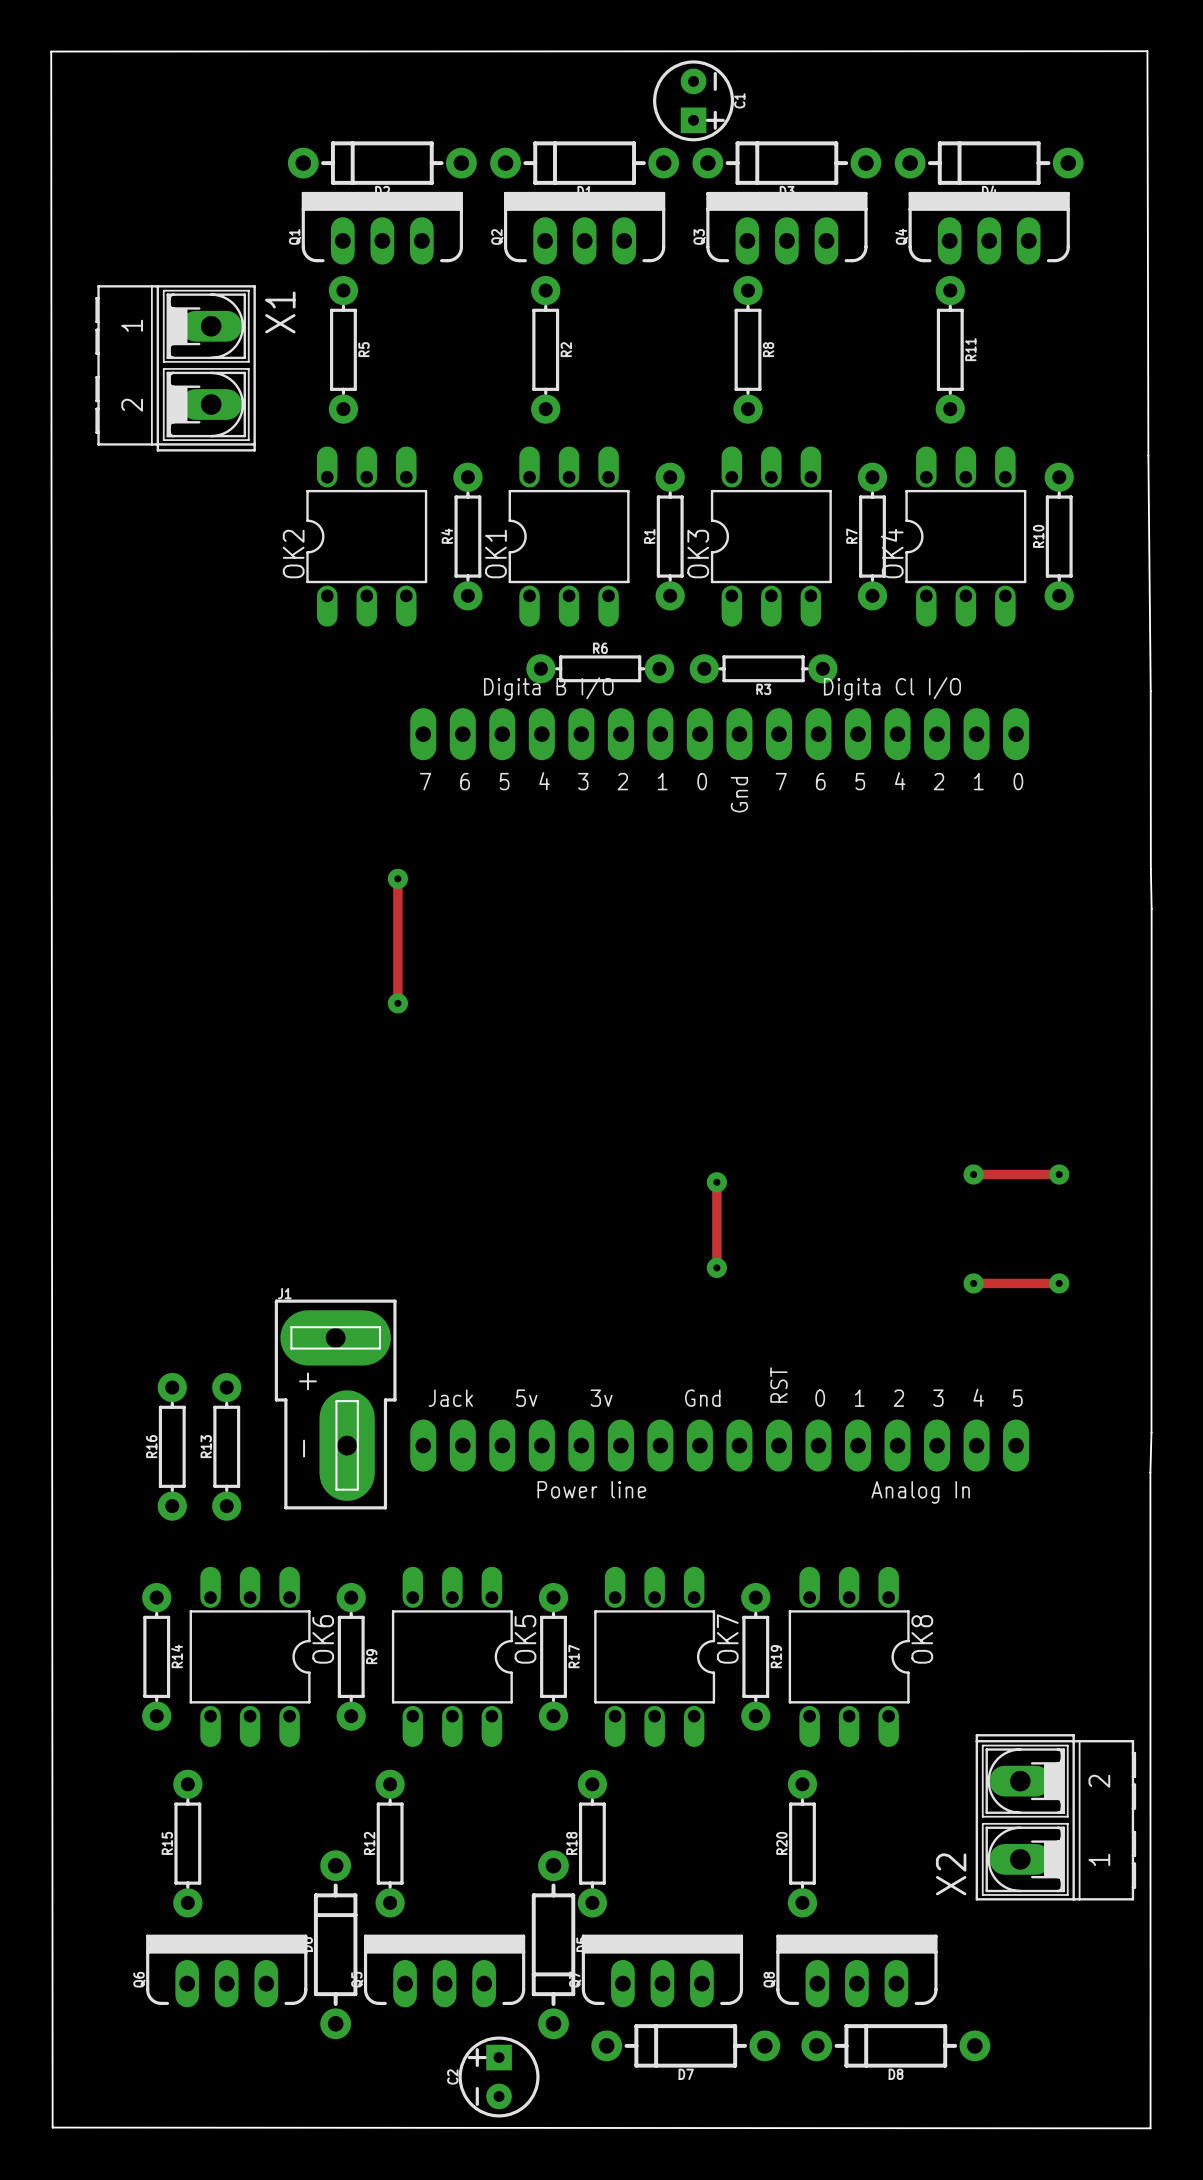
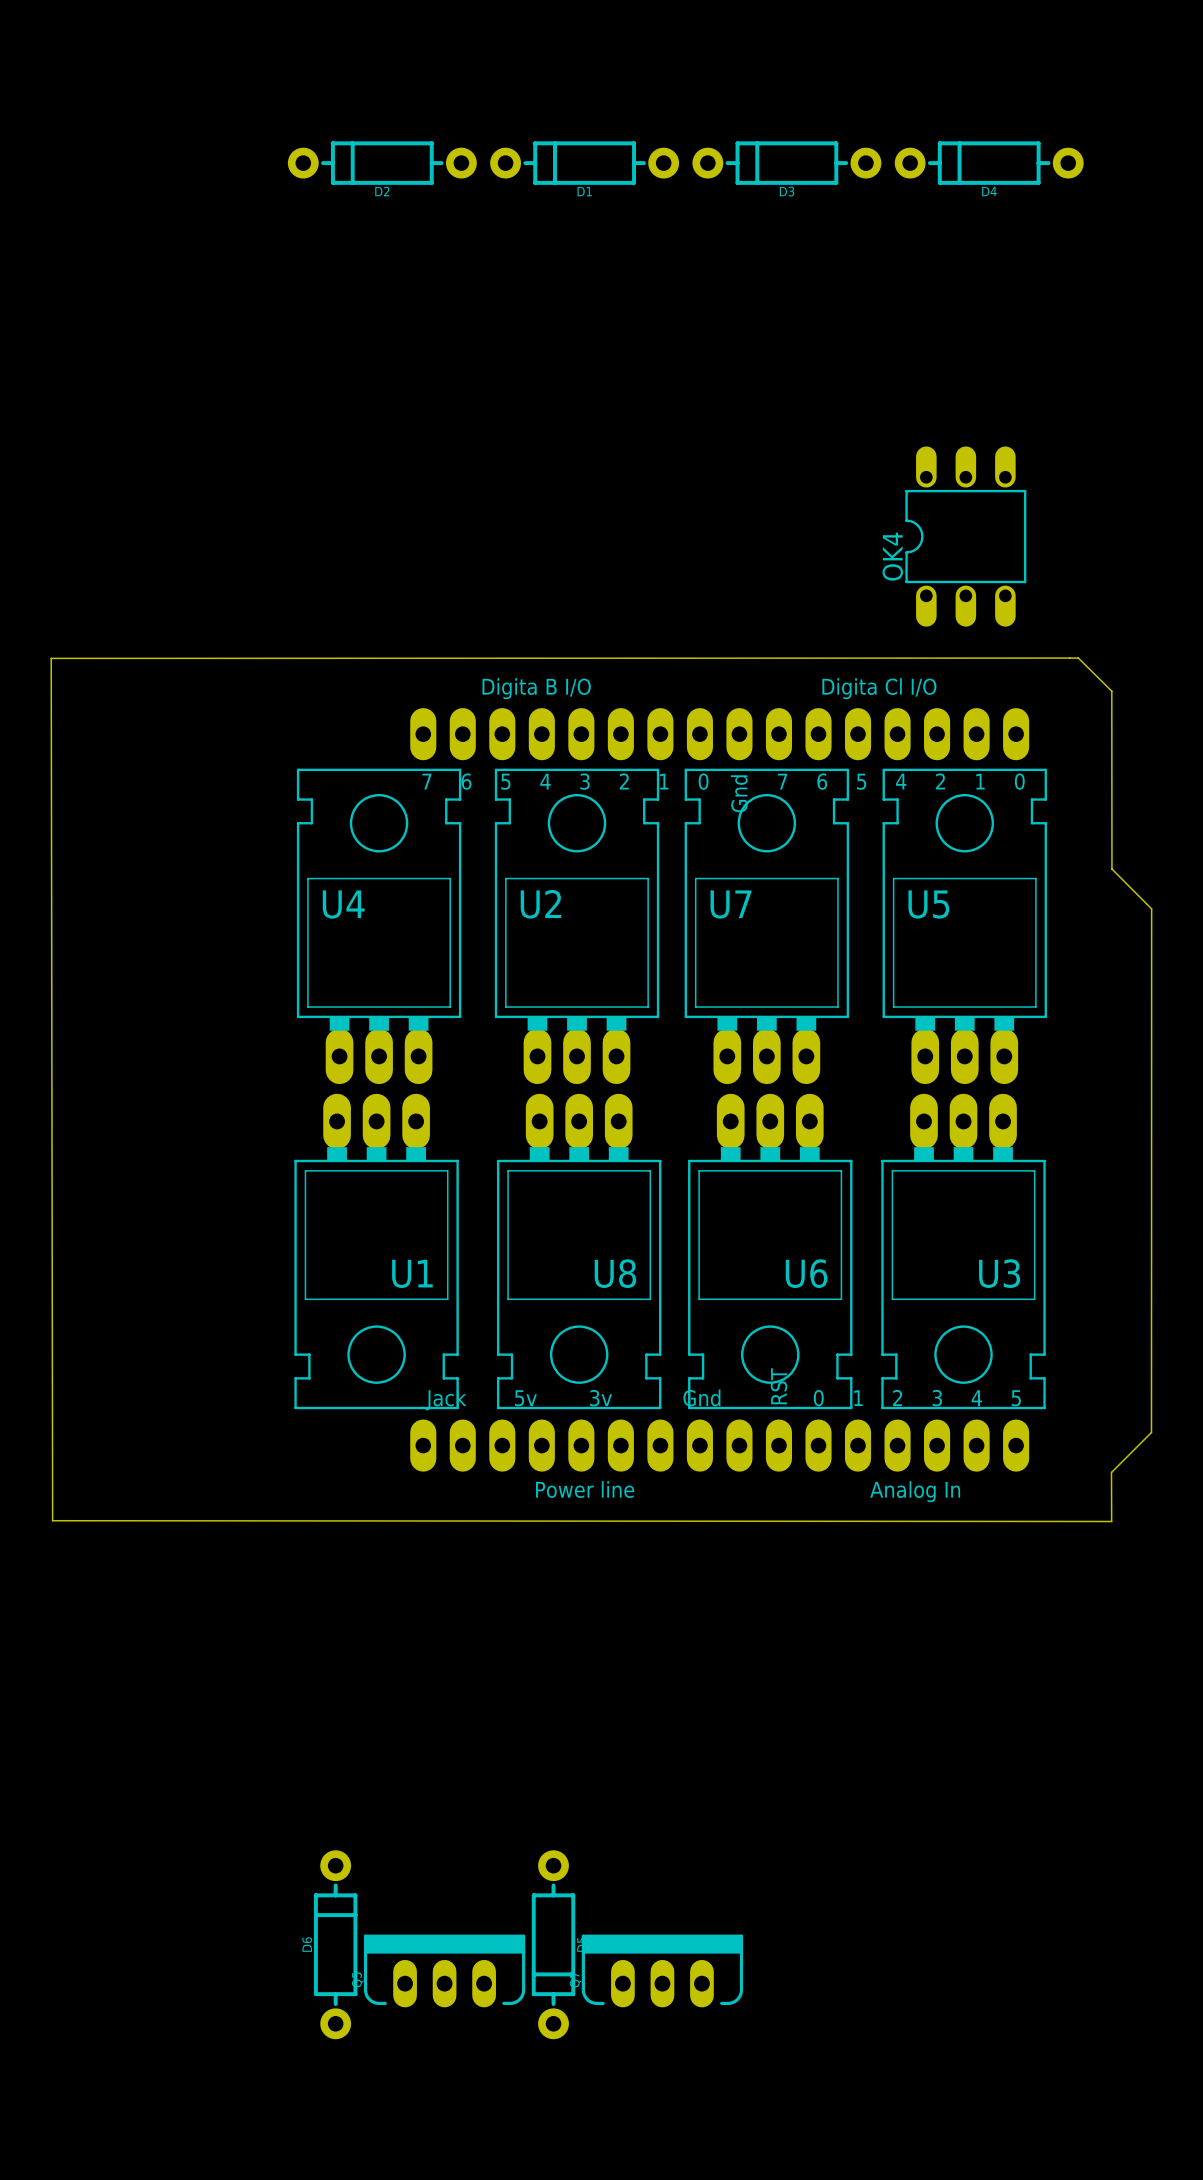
C1: (693, 100) -> none
Q1: (382, 228) -> none
Q2: (584, 228) -> none
Q3: (786, 228) -> none
Q4: (989, 228) -> none
R5: (343, 349) -> none
R2: (545, 349) -> none
R8: (748, 349) -> none
R11: (950, 349) -> none
X1: (175, 368) -> none
OK2: (366, 536) -> none
R4: (467, 536) -> none
OK1: (569, 536) -> none
R1: (670, 536) -> none
OK3: (771, 536) -> none
R7: (872, 536) -> none
R10: (1059, 536) -> none
R6: (600, 668) -> none
R3: (763, 668) -> none
track: (397, 878) (397, 1003) -> none
via: (397, 878) -> none
board edge: (1151, 908) (1147, 51) (51, 51) (52, 2127) (1150, 2128) (1151, 1432) -> (1151, 908) (1111, 869) (1111, 691) (1078, 658) (51, 658) (52, 1520) (1111, 1521) (1111, 1472) (1151, 1432)
U4: none -> (379, 926)
U2: none -> (577, 926)
U7: none -> (766, 926)
U5: none -> (964, 926)
via: (397, 1003) -> none
track: (973, 1174) (1059, 1174) -> none
via: (973, 1174) -> none
via: (1059, 1174) -> none
track: (716, 1182) (716, 1267) -> none
via: (716, 1182) -> none
U1: none -> (376, 1251)
U8: none -> (579, 1251)
U6: none -> (770, 1251)
U3: none -> (963, 1251)
via: (716, 1267) -> none
track: (973, 1283) (1059, 1283) -> none
via: (973, 1283) -> none
via: (1059, 1283) -> none
J1: (335, 1404) -> none
R16: (172, 1446) -> none
R13: (226, 1446) -> none
R14: (156, 1656) -> none
OK6: (250, 1656) -> none
R9: (351, 1656) -> none
OK5: (452, 1656) -> none
R17: (553, 1656) -> none
OK7: (654, 1656) -> none
R19: (755, 1656) -> none
OK8: (849, 1656) -> none
X2: (1055, 1817) -> none
R15: (187, 1843) -> none
R12: (390, 1843) -> none
R18: (592, 1843) -> none
R20: (802, 1843) -> none
Q6: (226, 1971) -> none
Q8: (856, 1971) -> none
D7: (685, 2045) -> none
D8: (895, 2045) -> none
C2: (499, 2077) -> none

